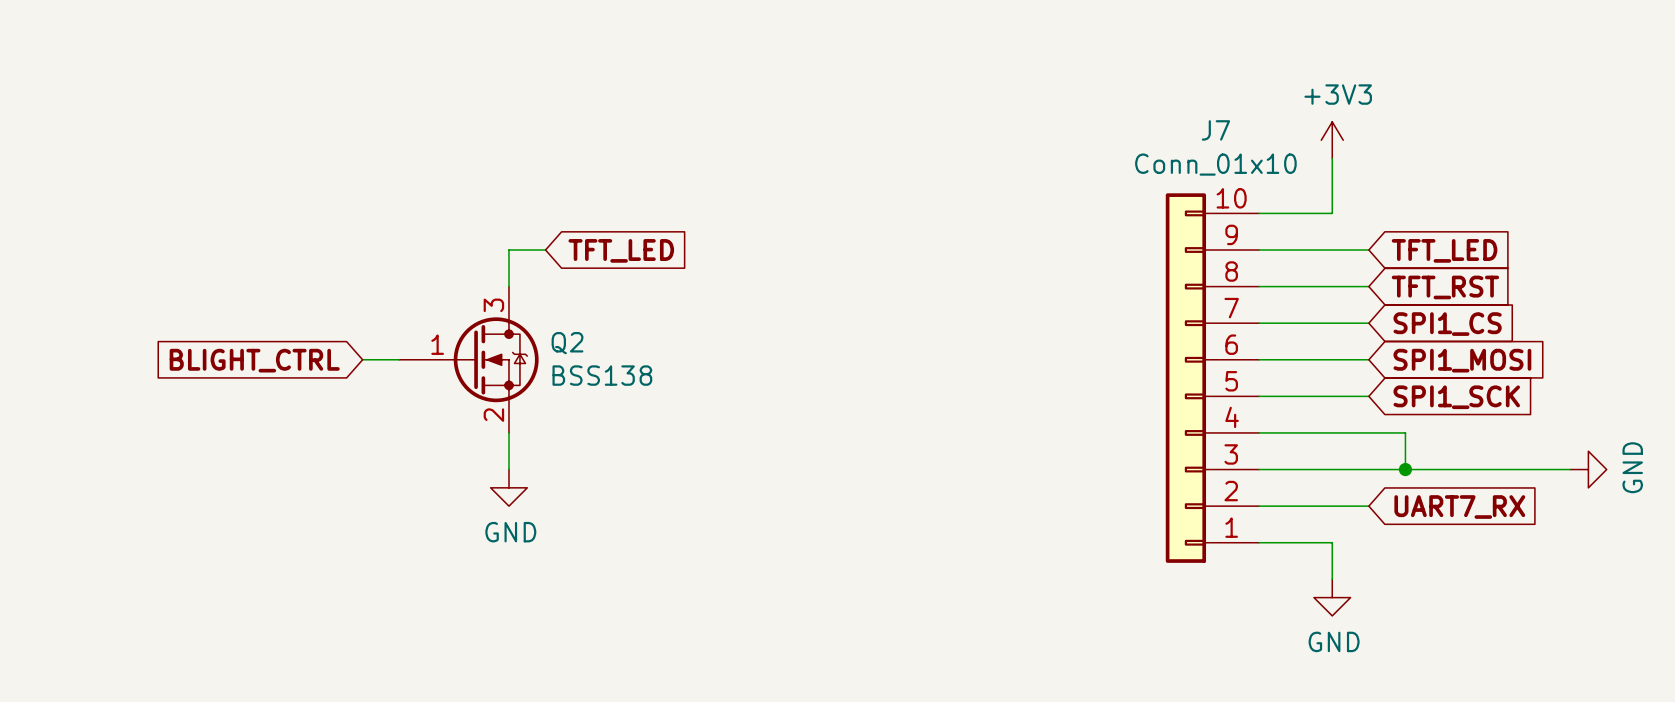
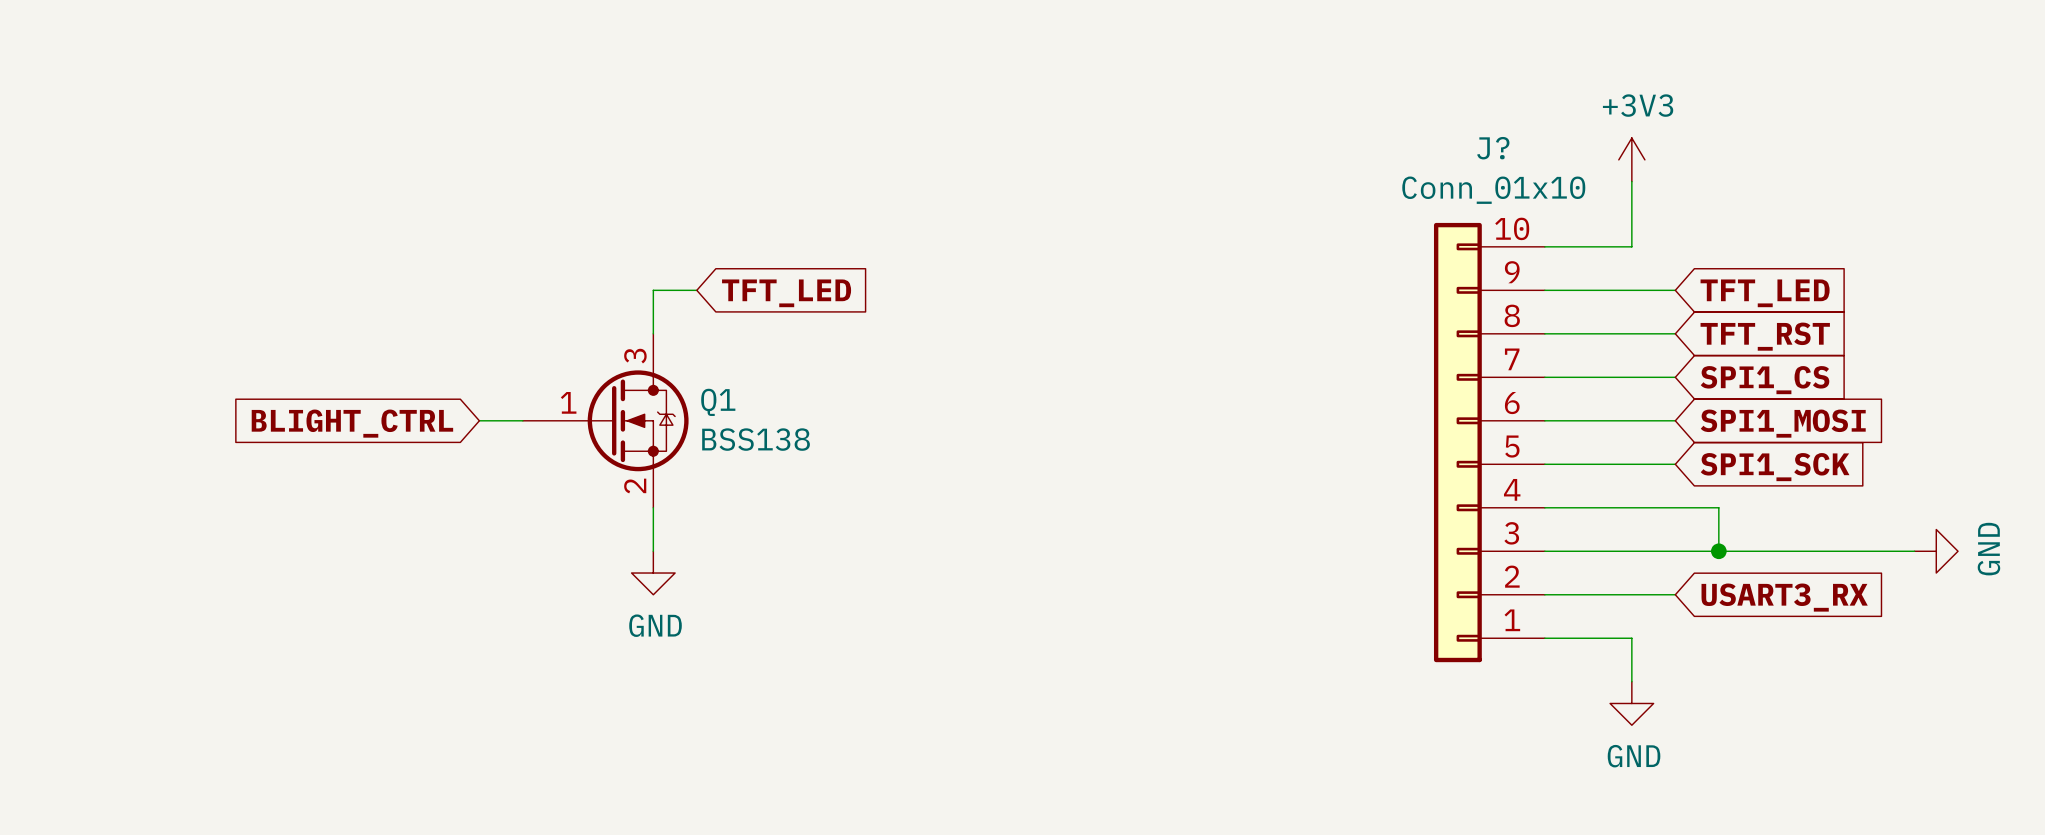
J7 name: J7 (1215, 130) -> J? (1493, 148)
Q2 name: Q2 (567, 343) -> Q1 (718, 402)
global label: UART7_RX (1459, 507) -> USART3_RX (1784, 597)

